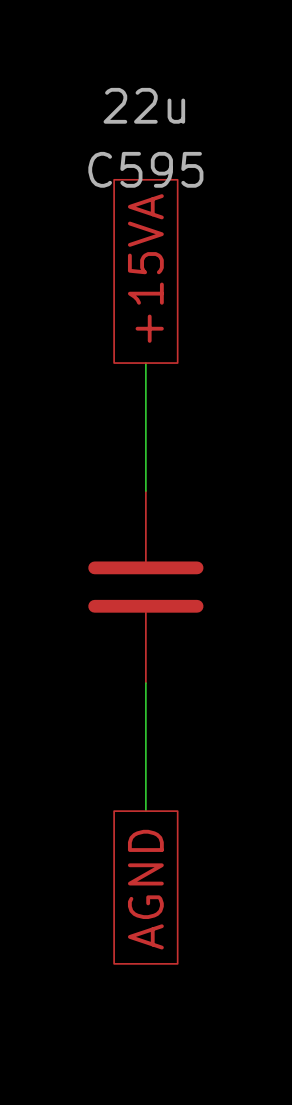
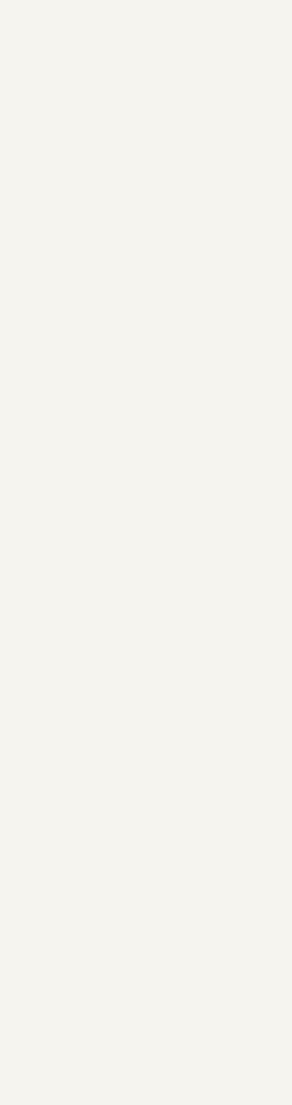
global label: +15VA (145, 268) -> none
wire: (145, 363) (145, 491) -> none
C595: 22u (145, 587) -> none
wire: (145, 683) (145, 811) -> none
global label: AGND (145, 889) -> none

